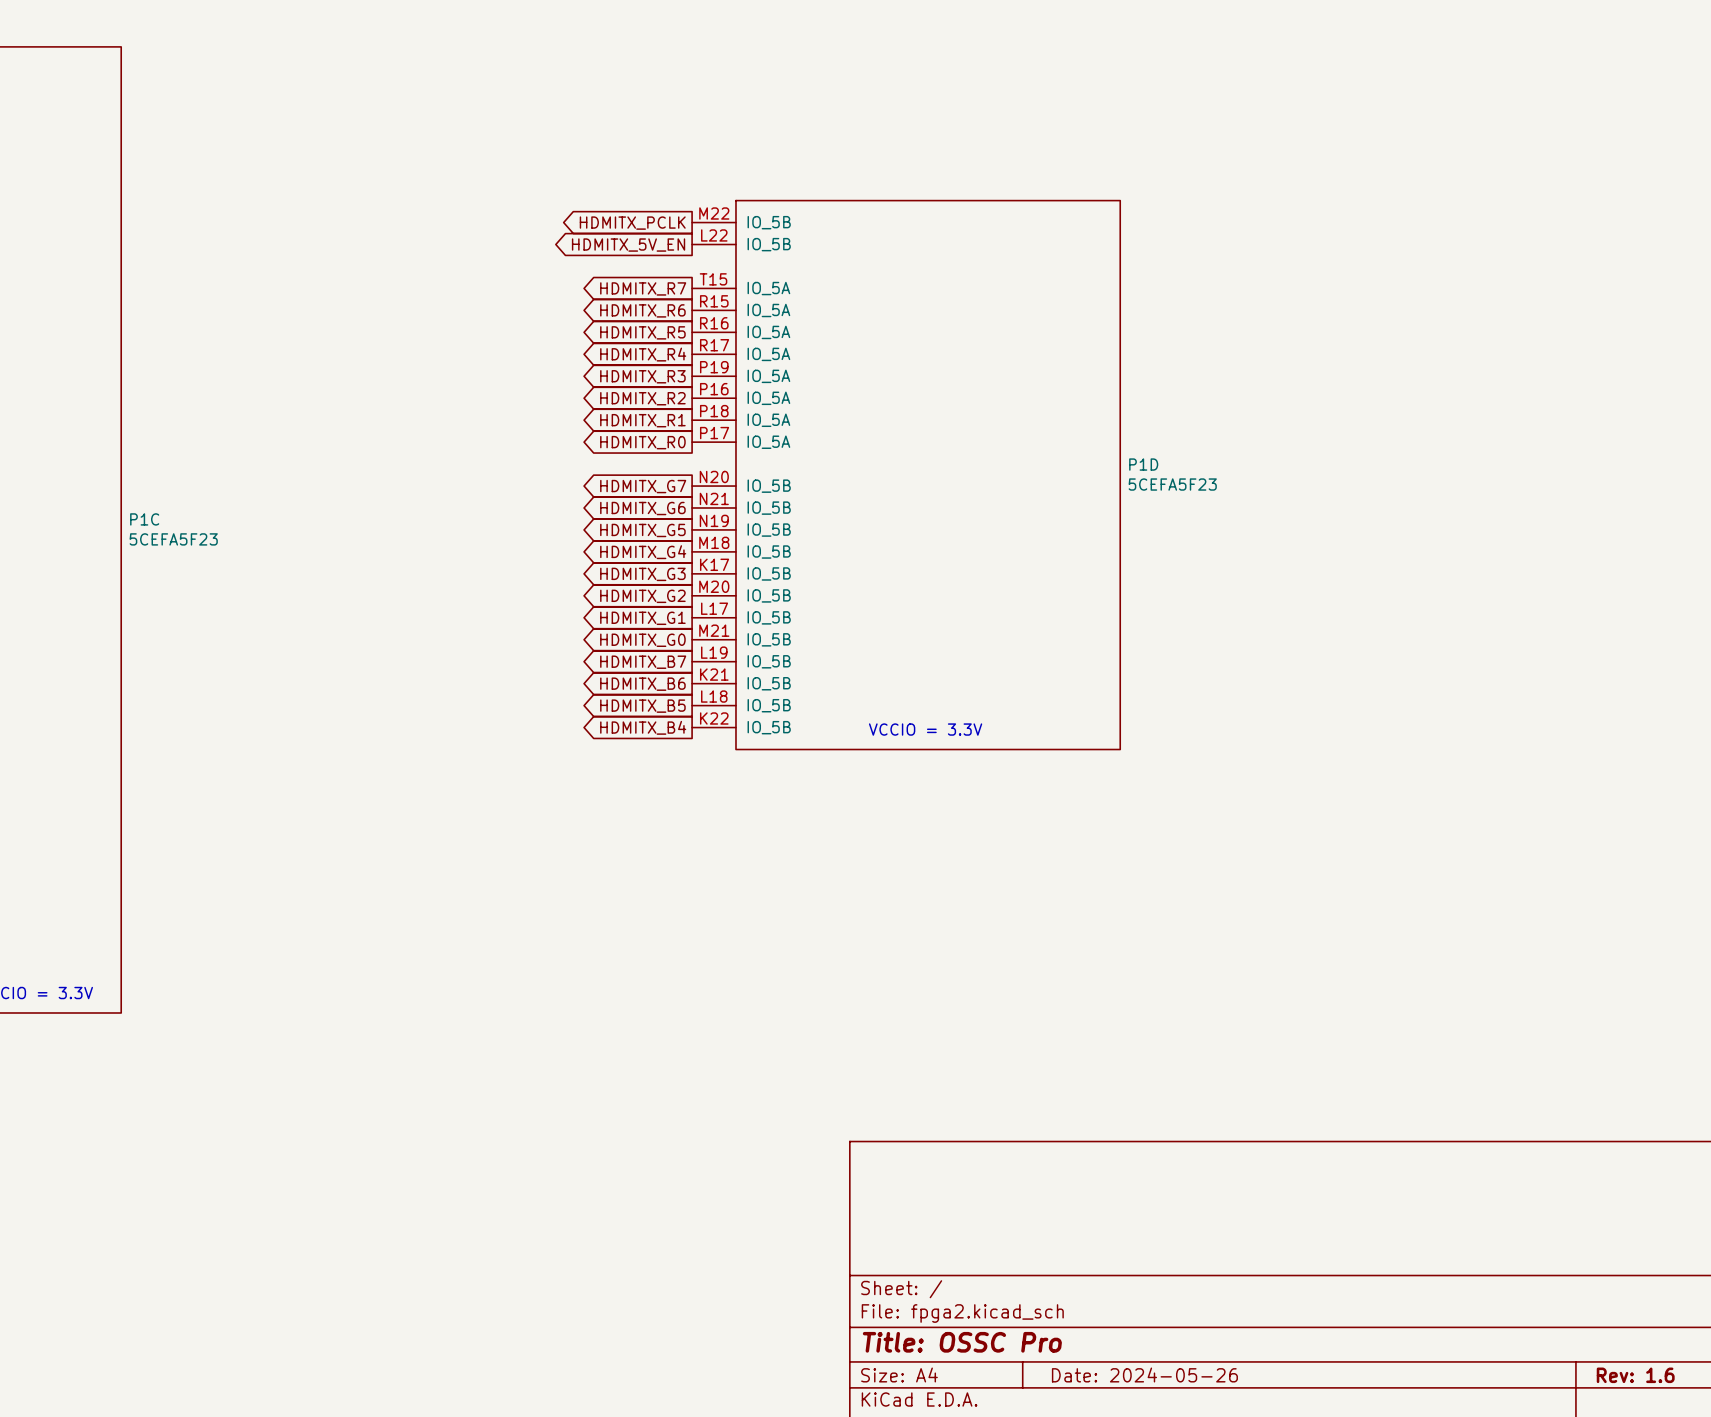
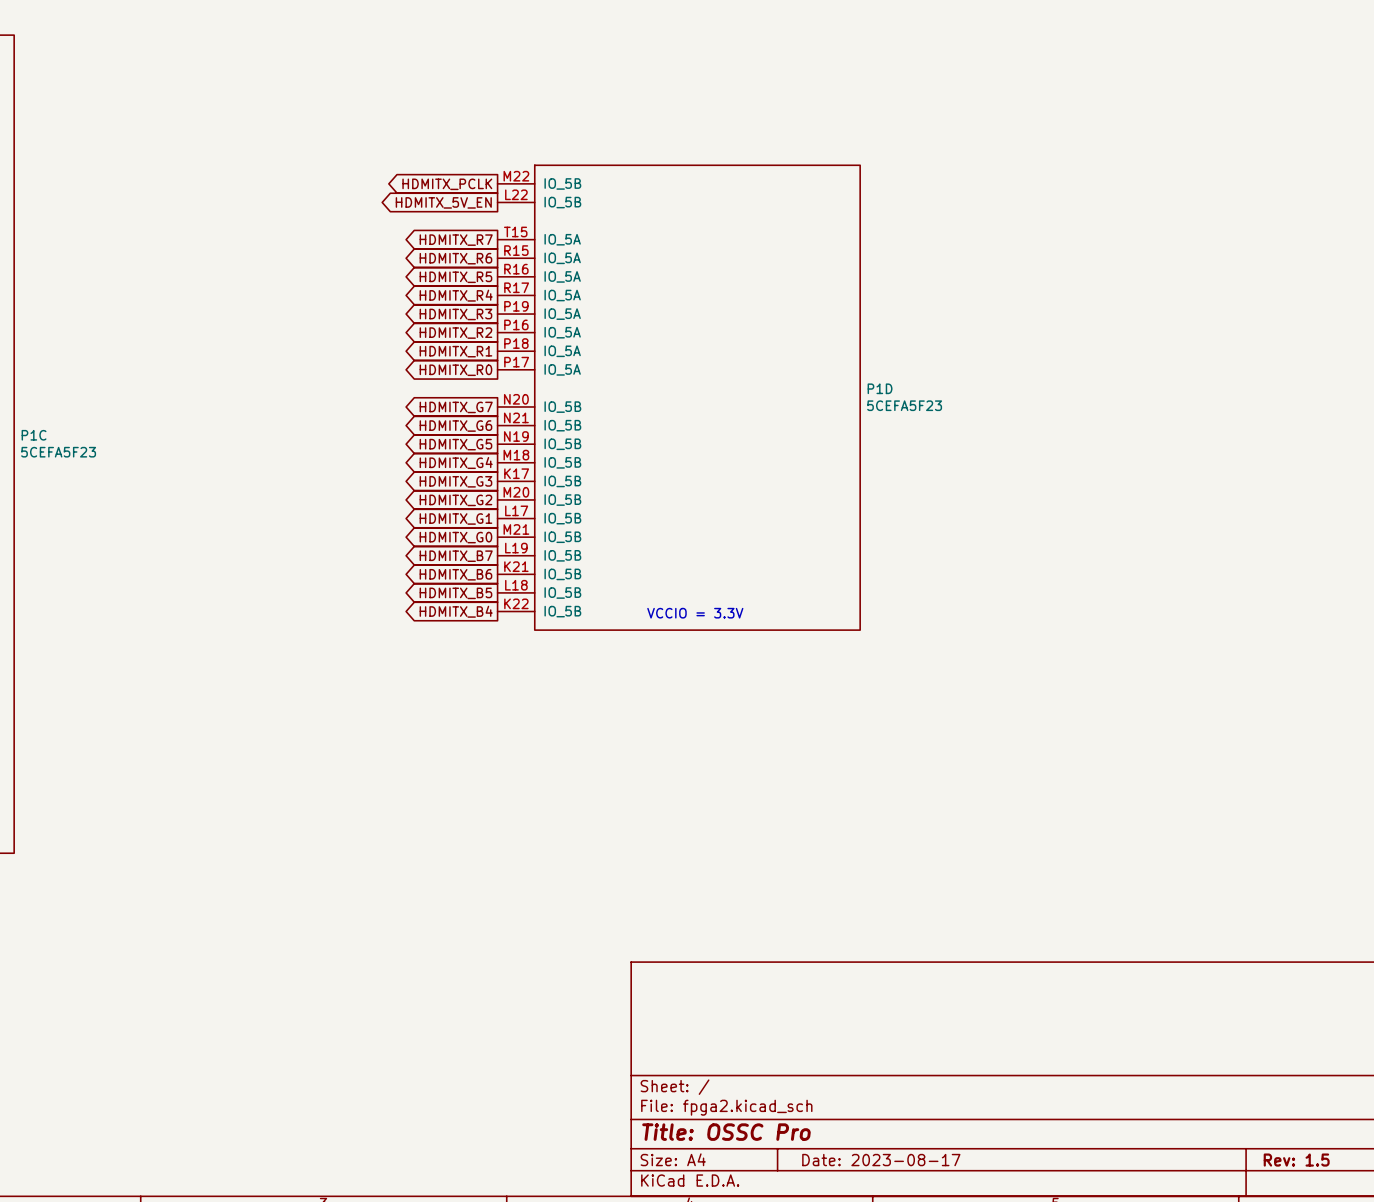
title block: Date: 2024-05-26 (1144, 1375) -> Date: 2023-08-17 (881, 1160)
title block: Rev: 1.6 (1635, 1375) -> Rev: 1.5 (1296, 1160)

